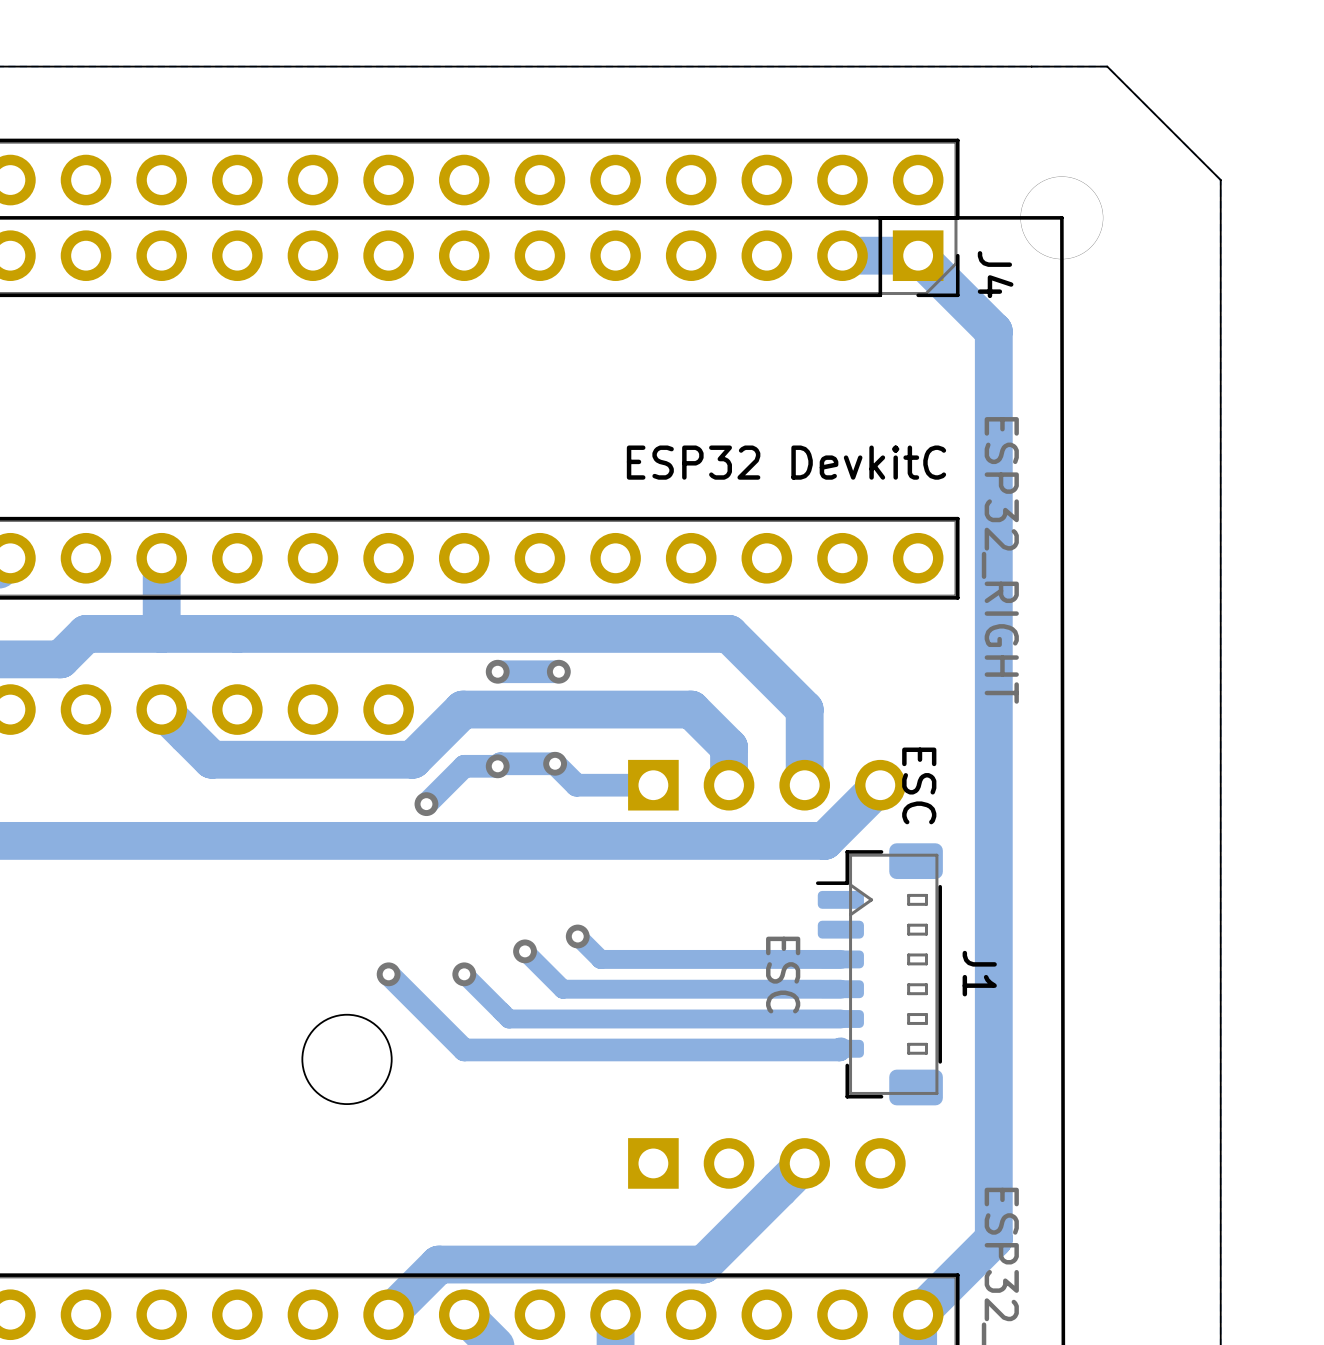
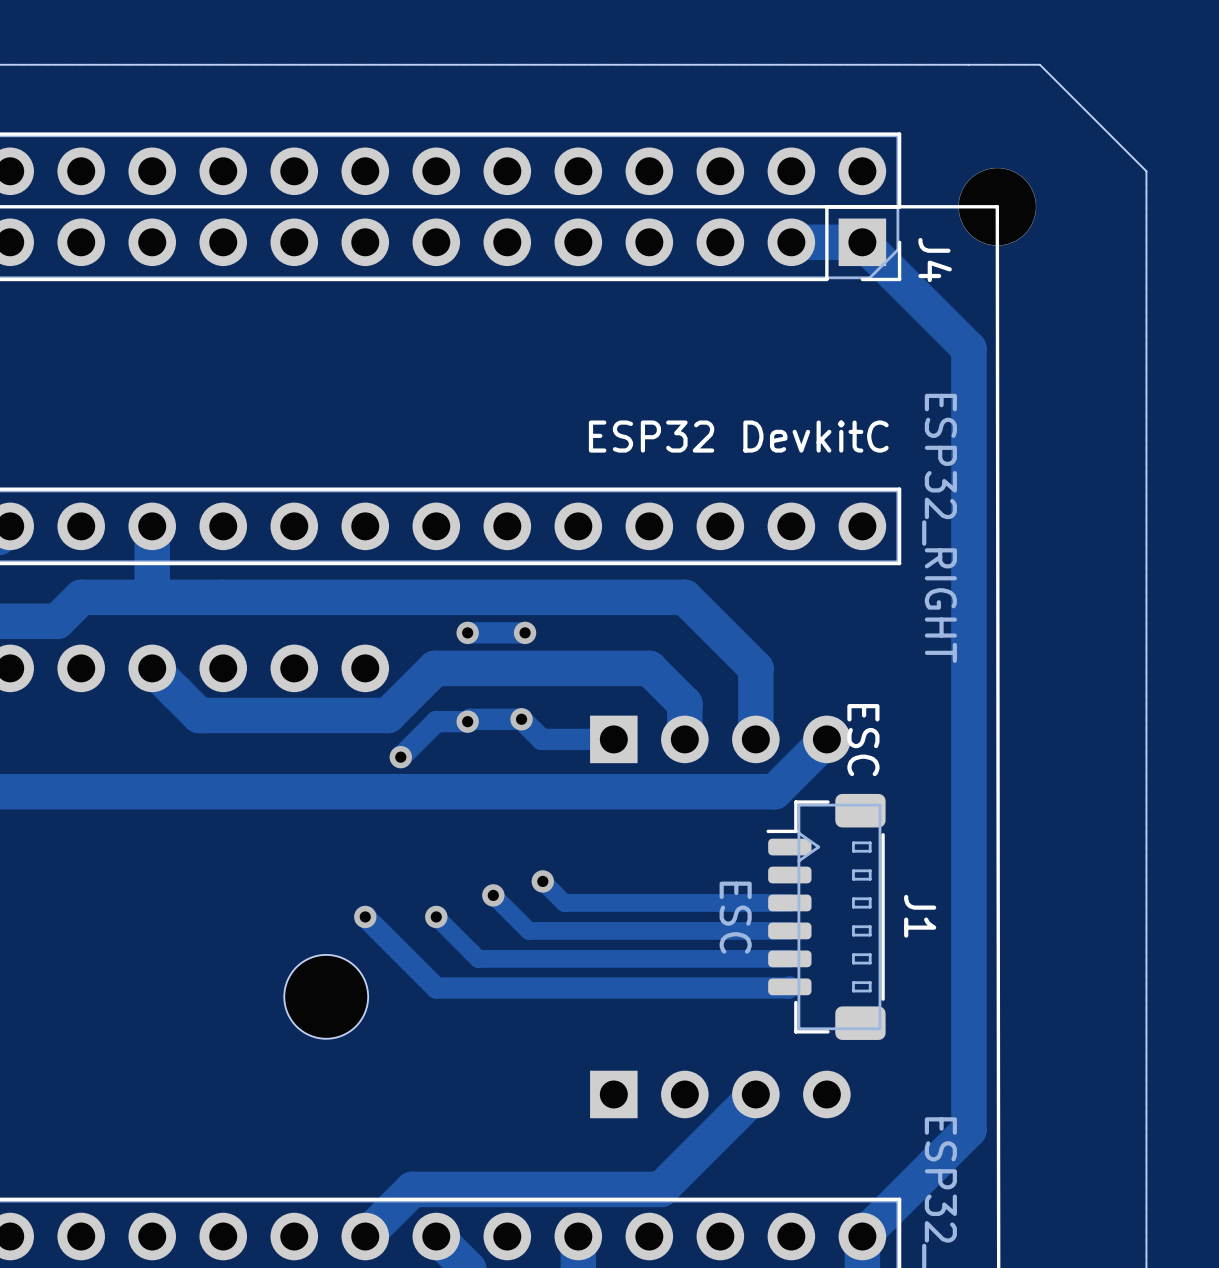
track: (993, 331) (993, 1239) -> (933, 313) (968, 348) (968, 1129) (933, 1165)

